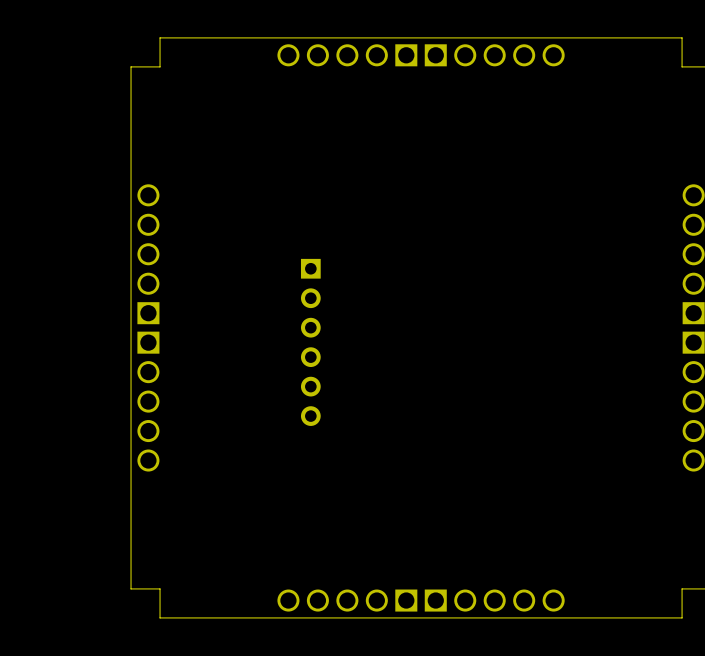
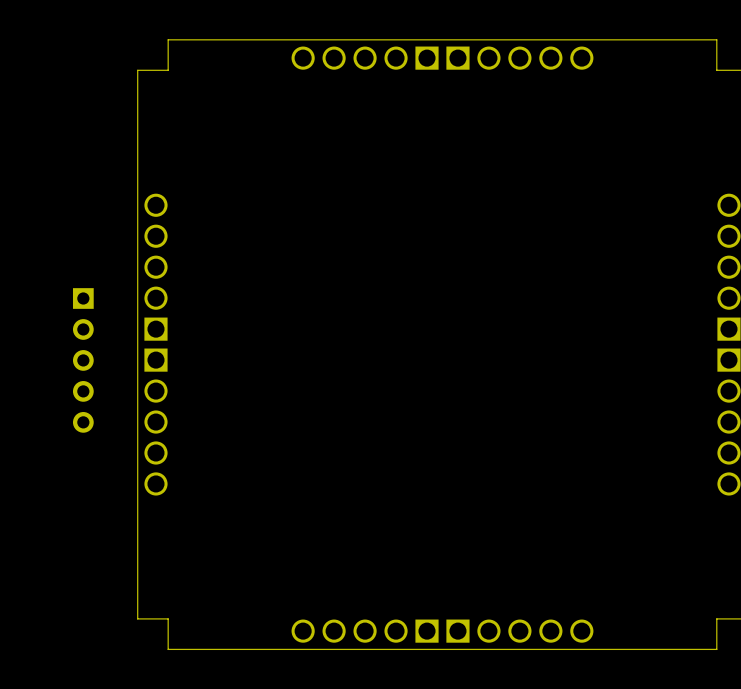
part: none -> (83, 360)
part: (310, 342) -> none

